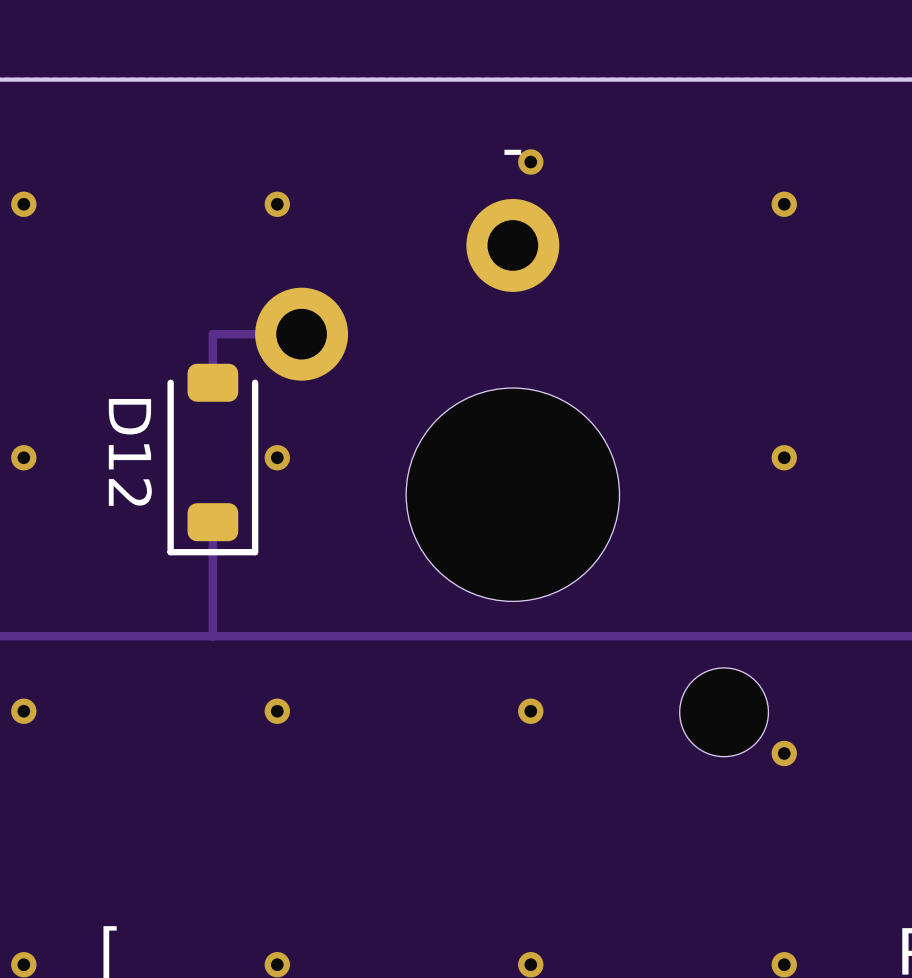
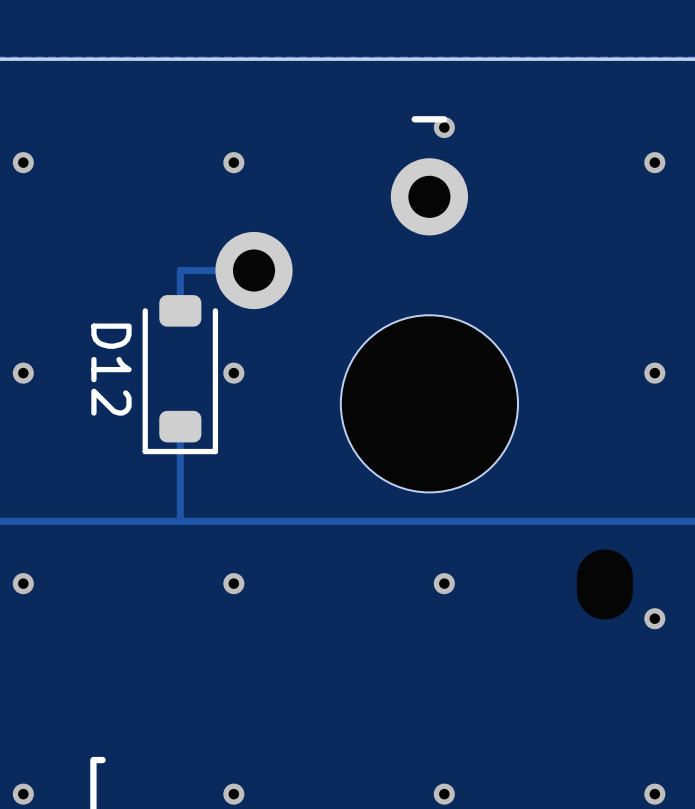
part footprint: [255, 198, 769, 757] -> [215, 158, 633, 620]

